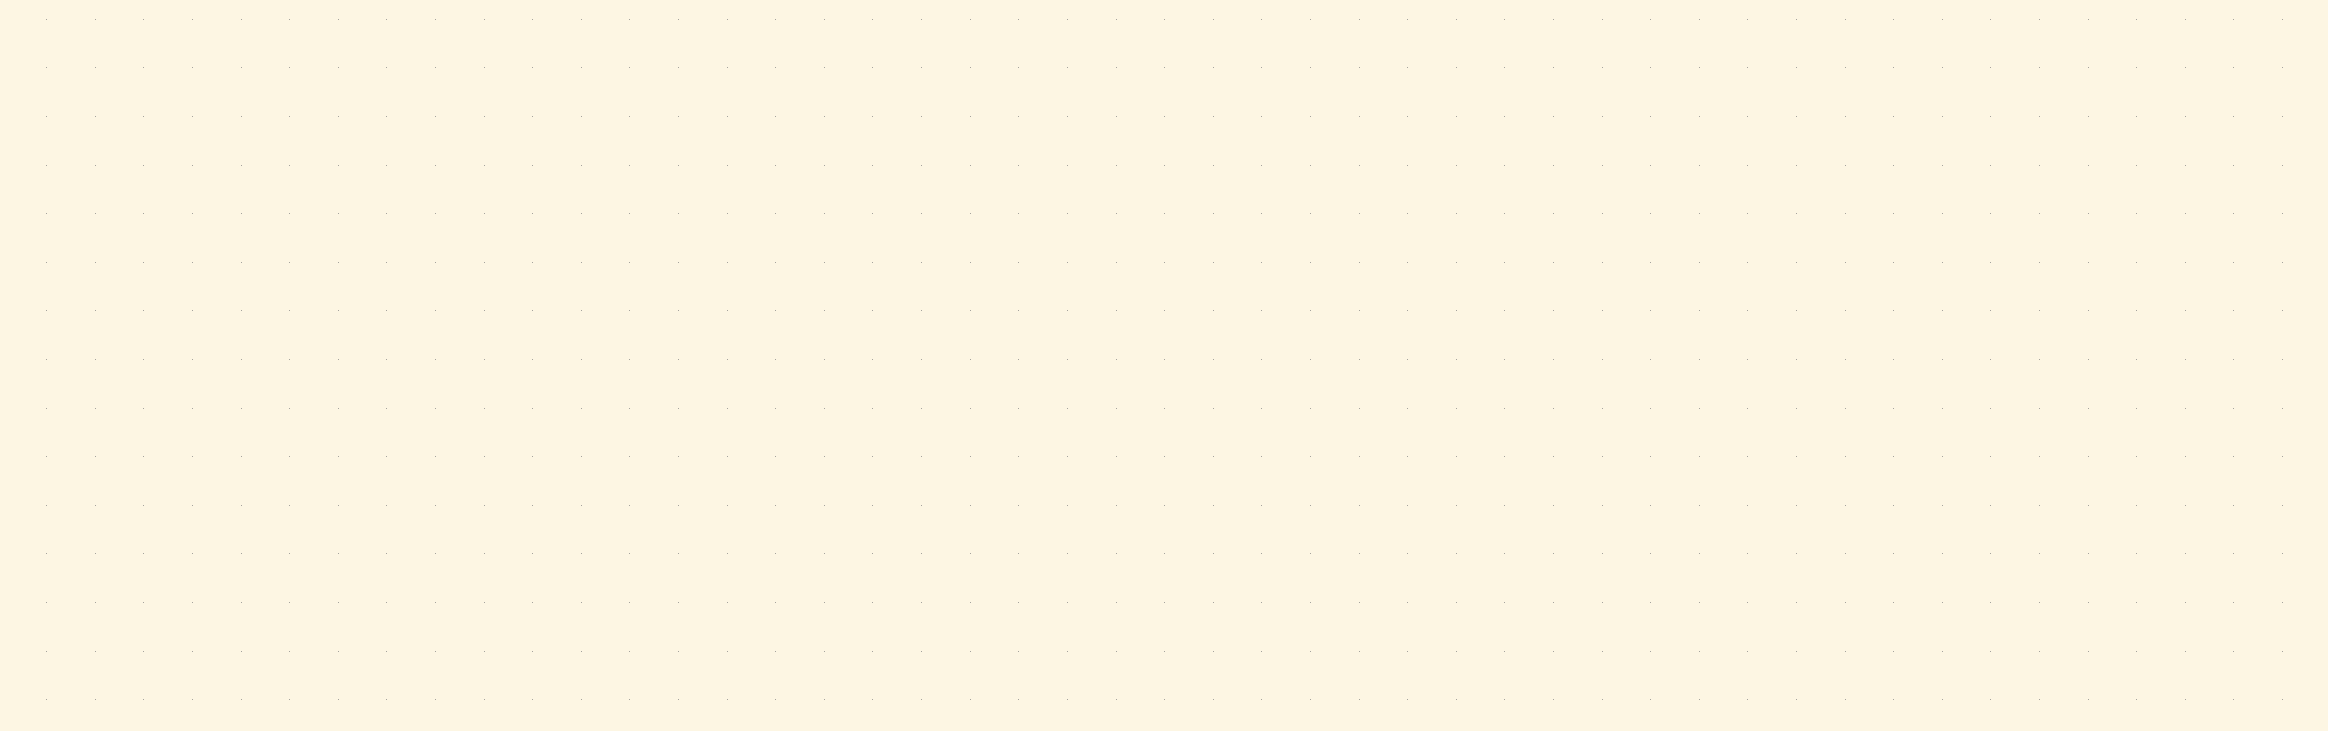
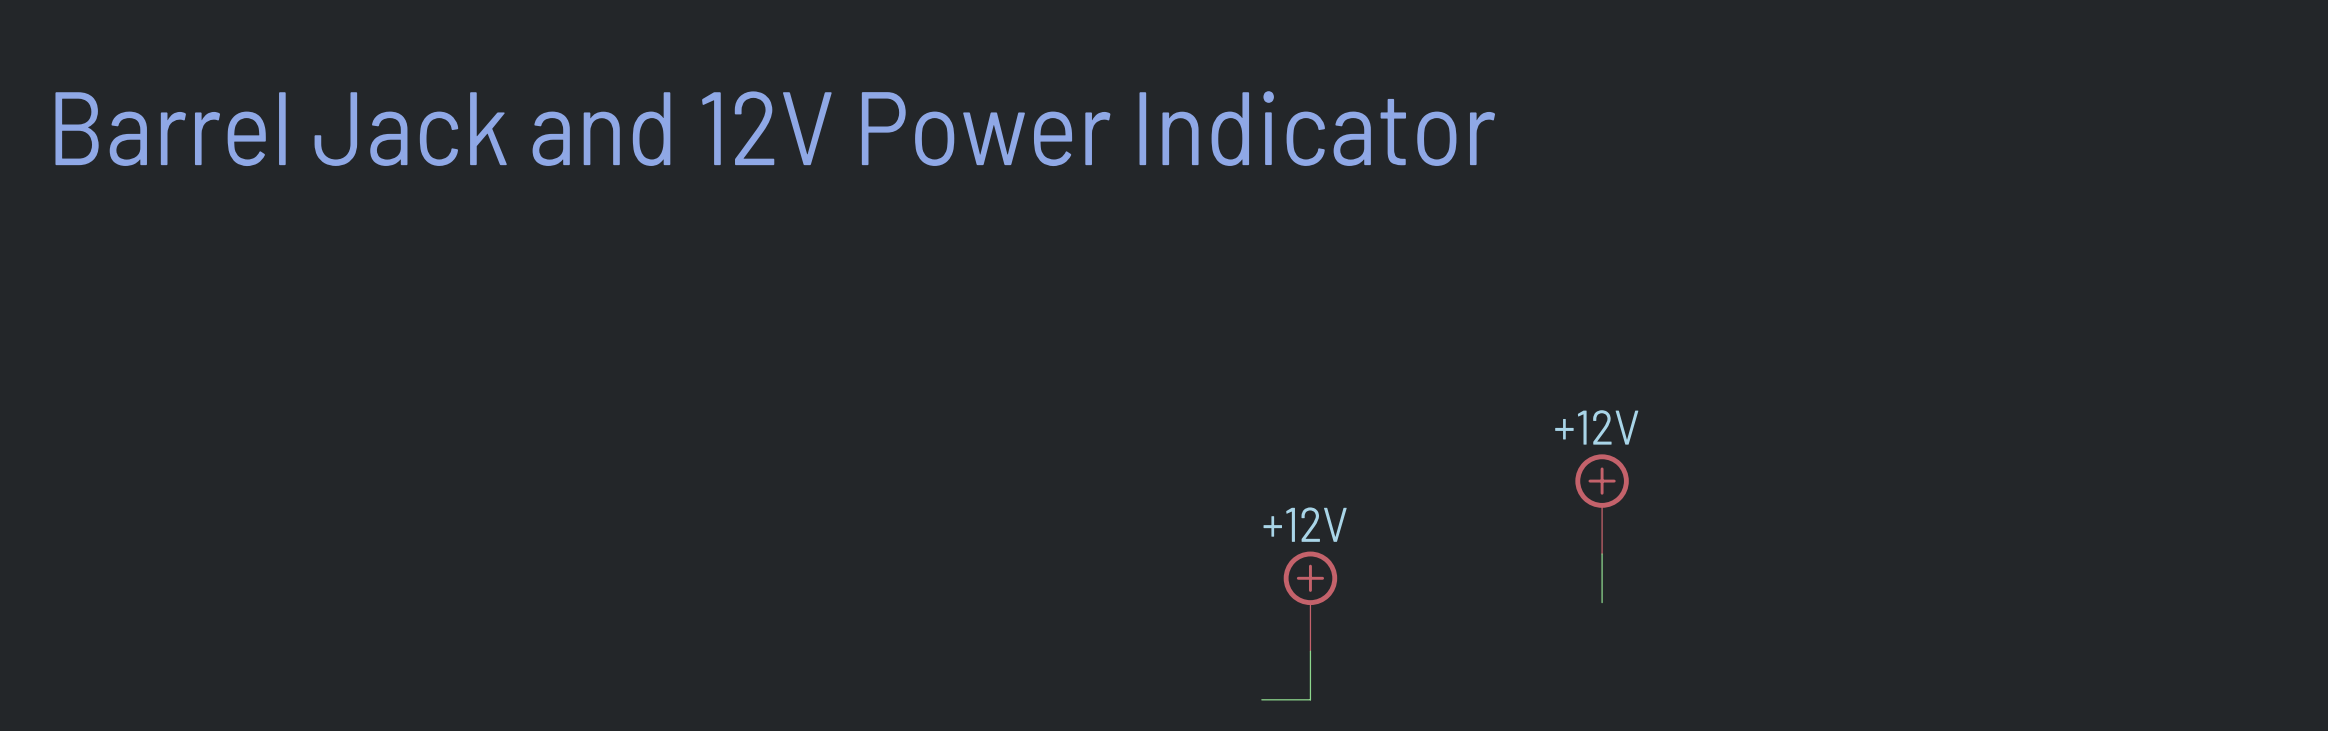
text: none -> Barrel Jack and 12V Power Indicator (775, 128)
power symbol: none -> +12V (1602, 504)
wire: none -> (1602, 553) (1602, 602)
power symbol: none -> +12V (1310, 601)
wire: none -> (1310, 651) (1310, 699) (1261, 699)

